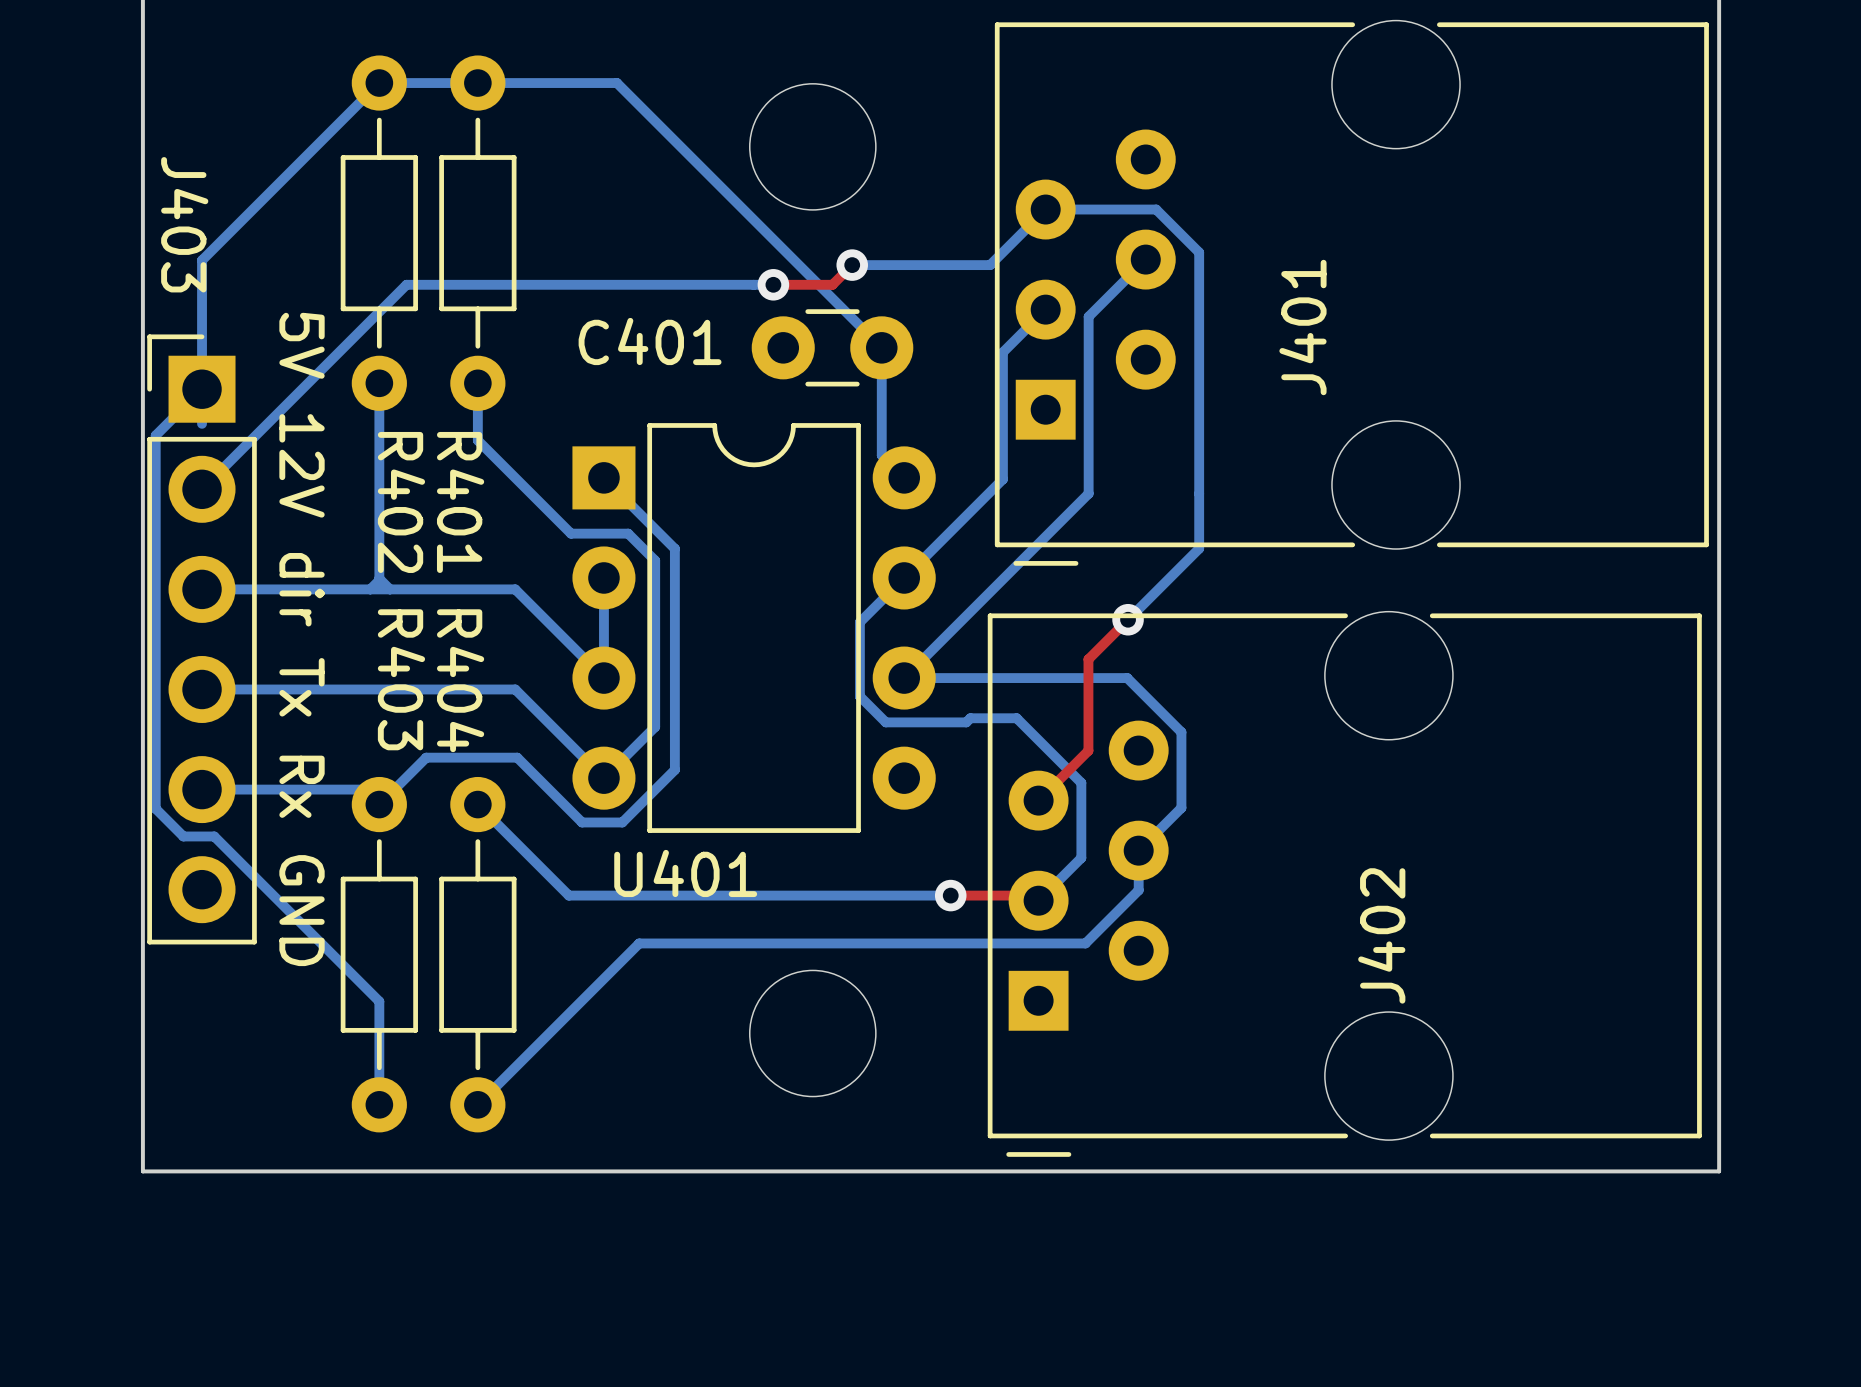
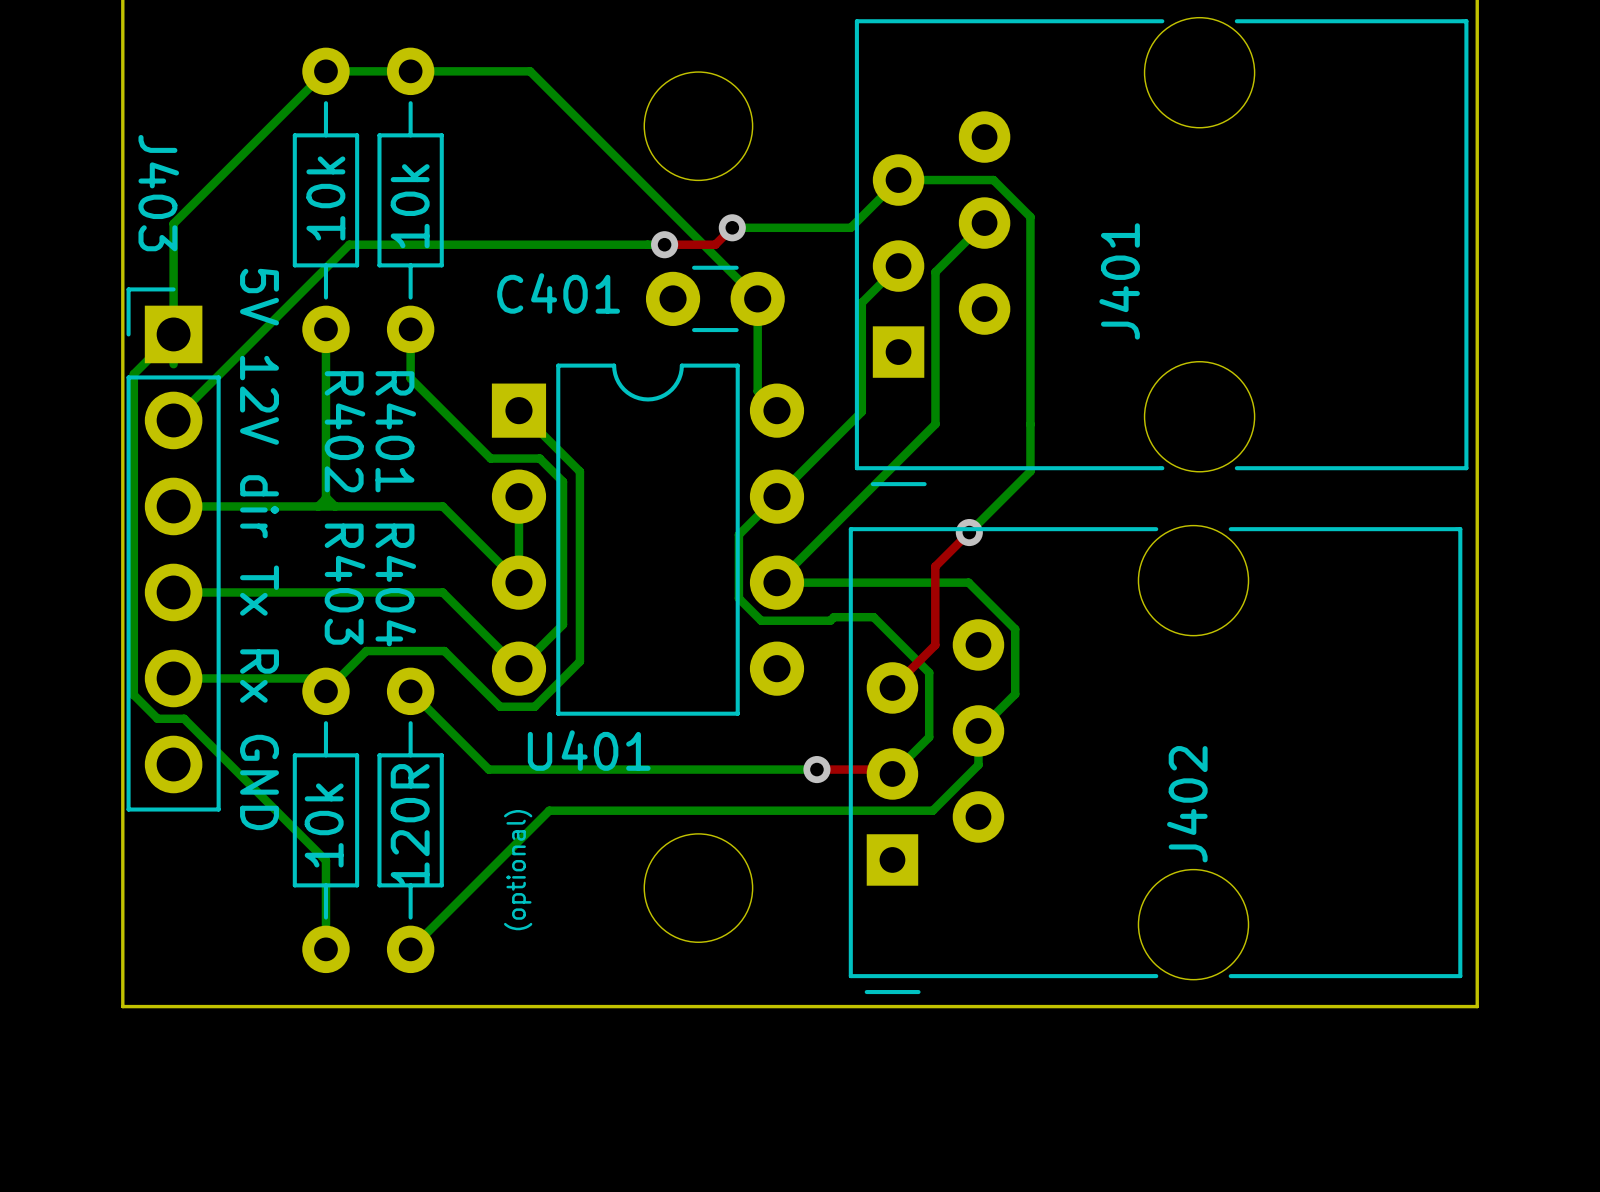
R402 value: none -> 10k (325, 198)
R401 value: none -> 10k (410, 206)
R403 value: none -> 10k (324, 825)
R404 value: none -> 120R (410, 825)
text: none -> (optional) (518, 870)

